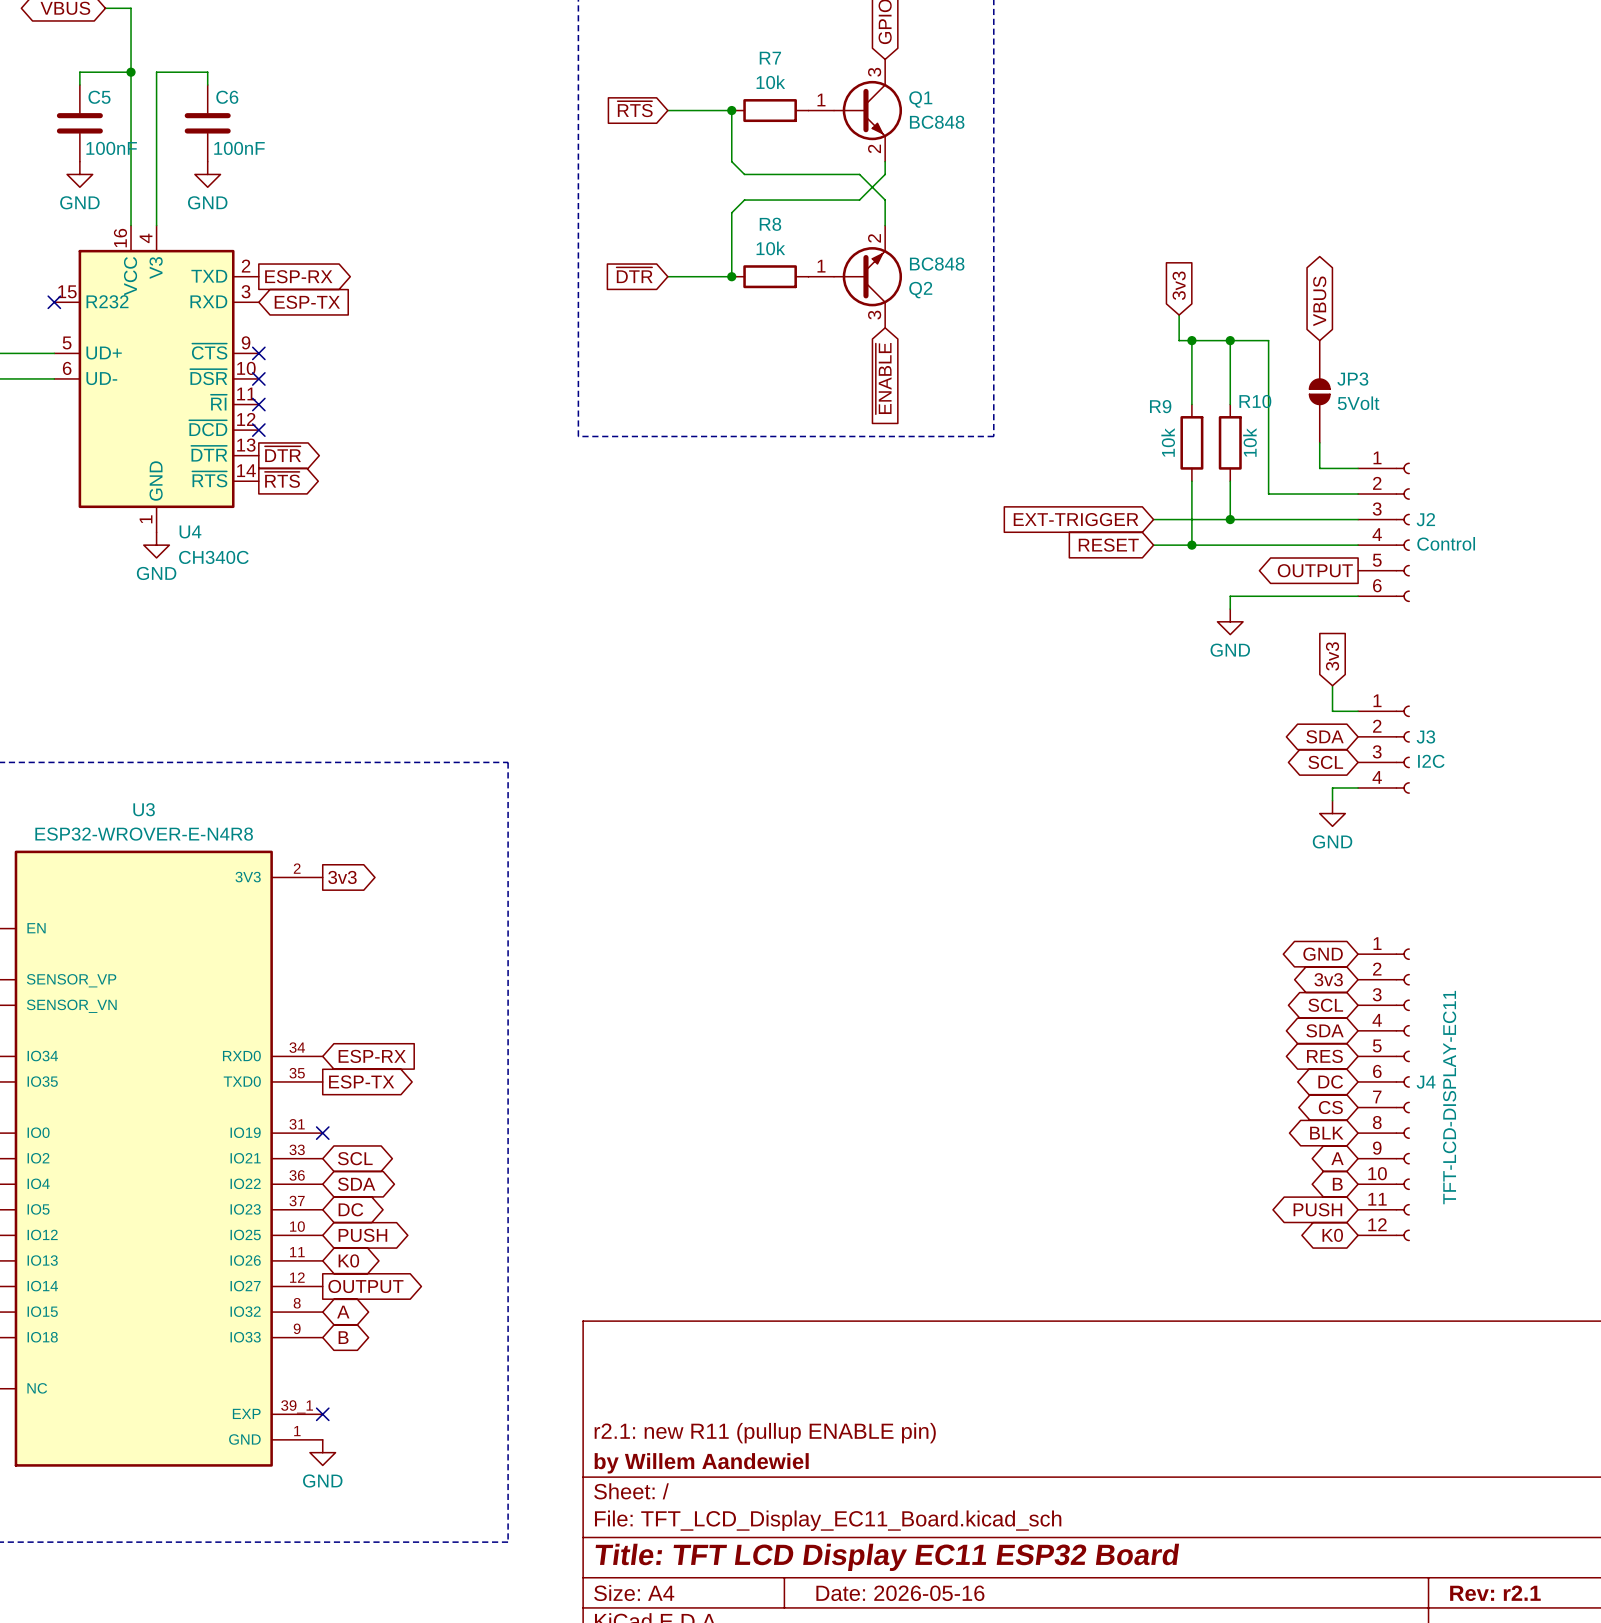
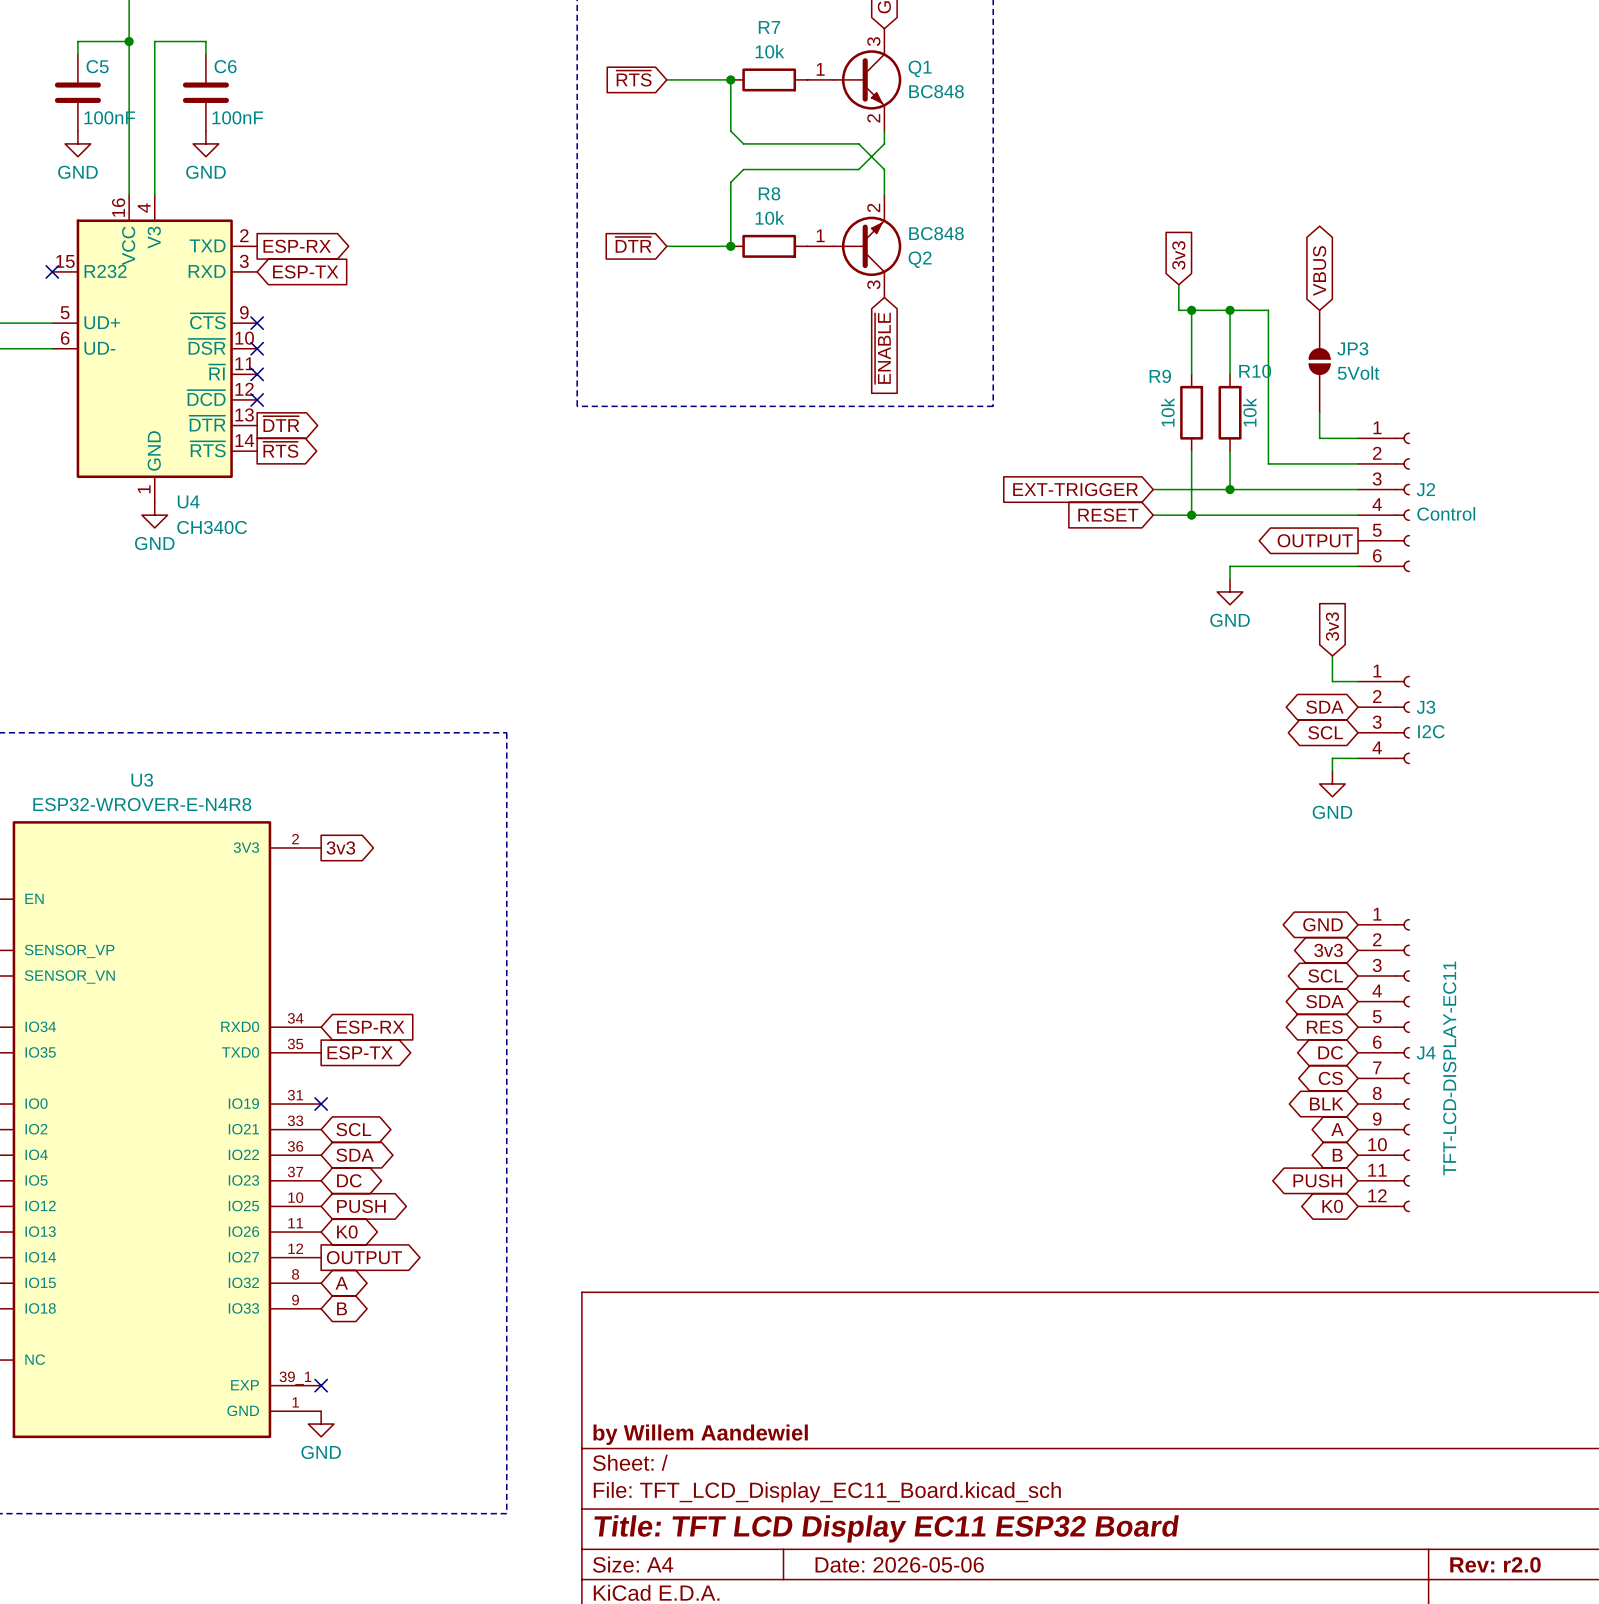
title block: r2.1: new R11 (pullup ENABLE pin) (765, 1433) -> none
title block: Date: 2026-05-16 (900, 1593) -> Date: 2026-05-06 (899, 1564)
title block: Rev: r2.1 (1495, 1593) -> Rev: r2.0 (1495, 1564)

